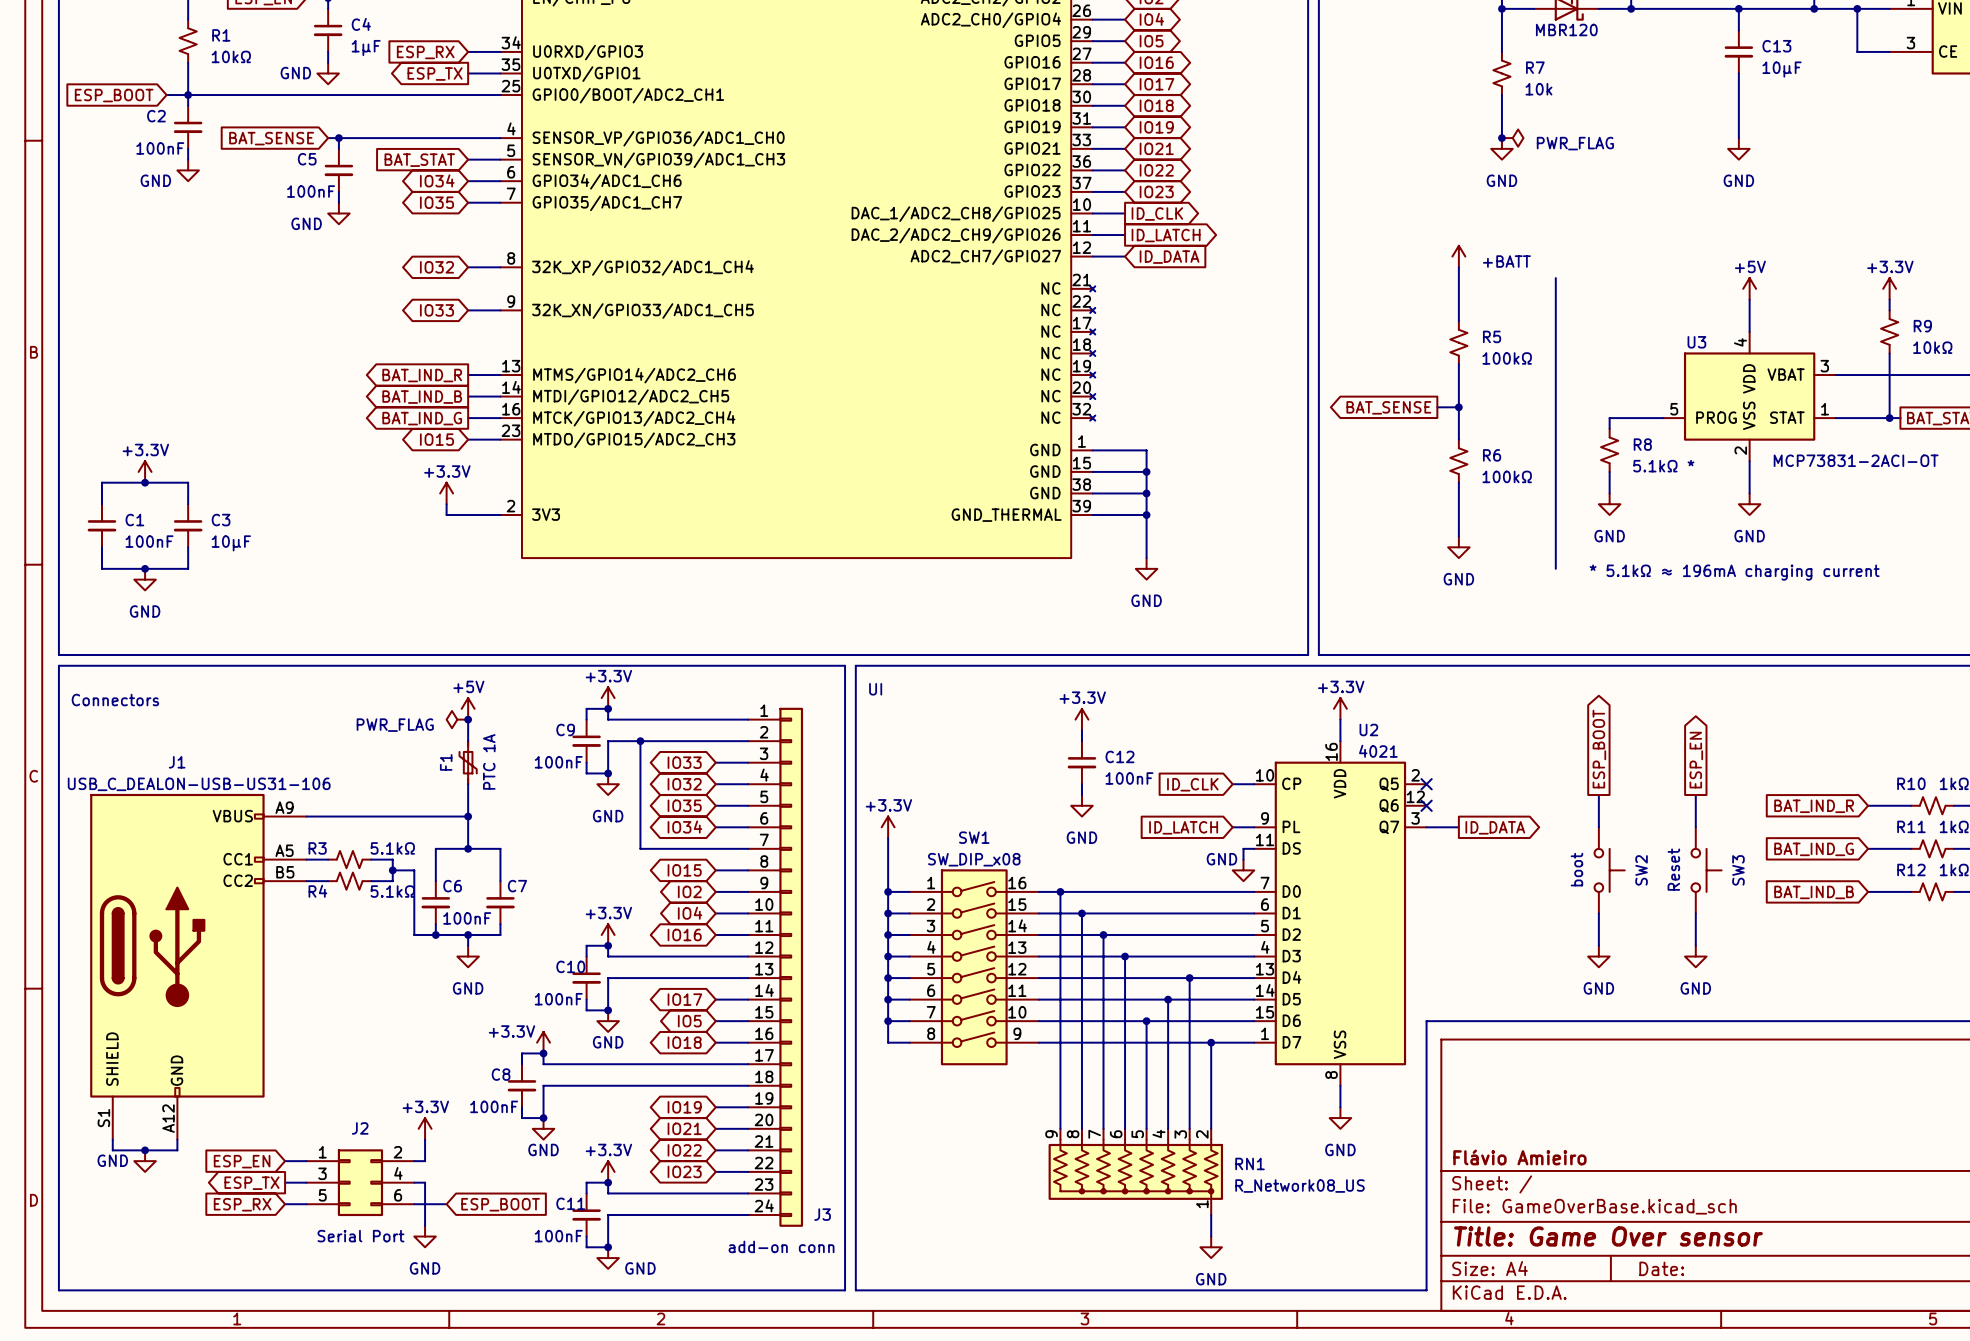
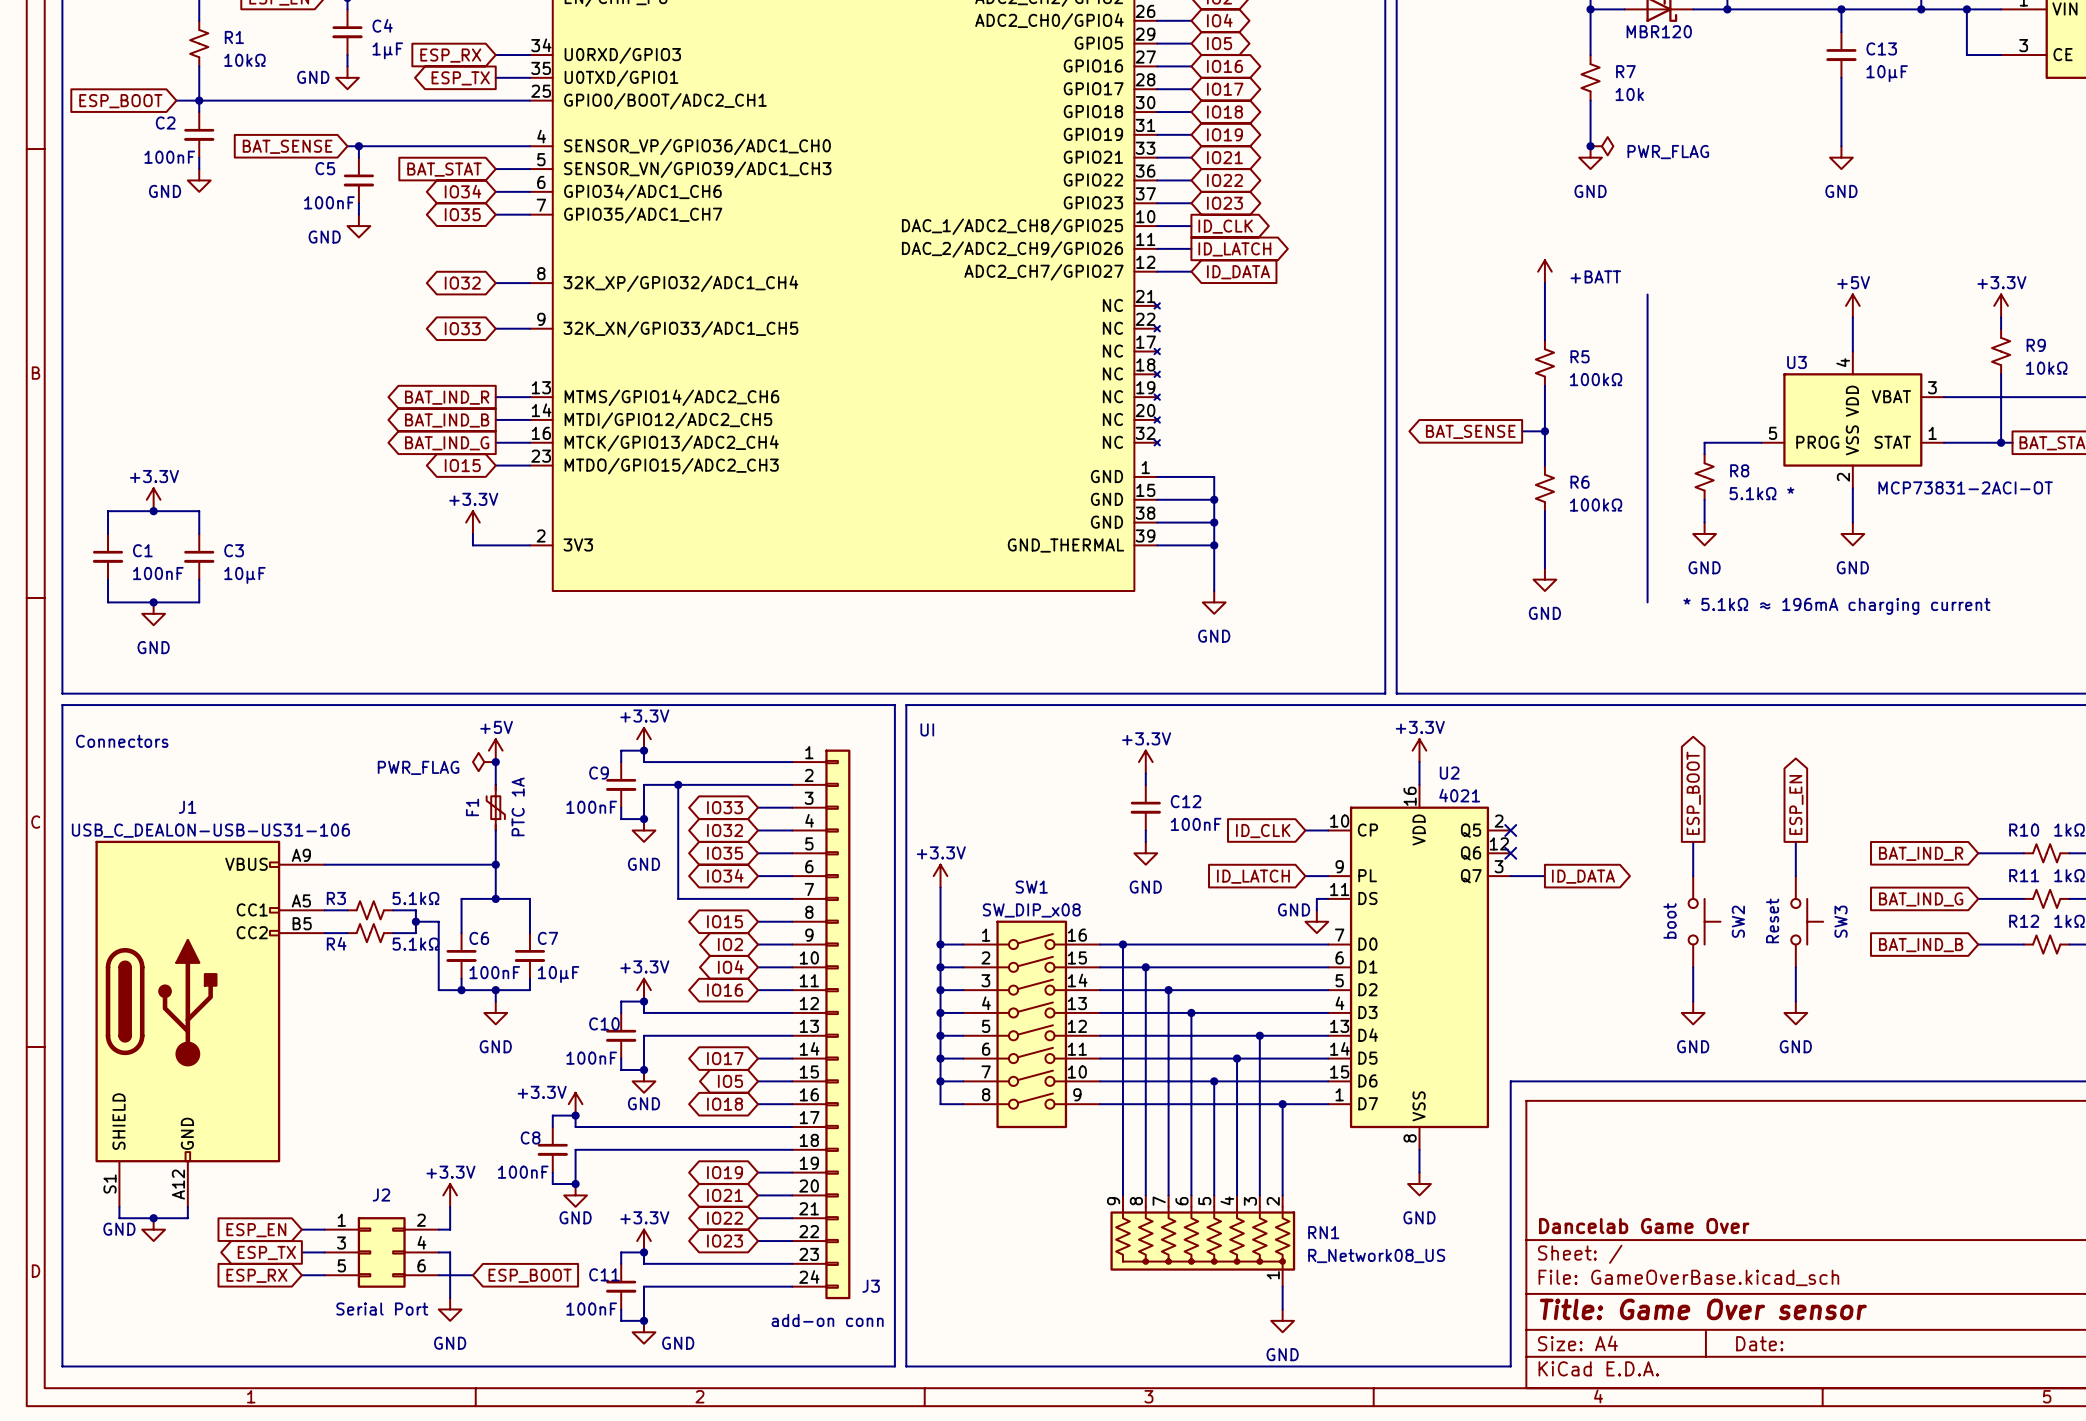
C7 value: none -> 10µF (558, 974)
title block: Flávio Amieiro (1519, 1157) -> Dancelab Game Over (1644, 1226)

